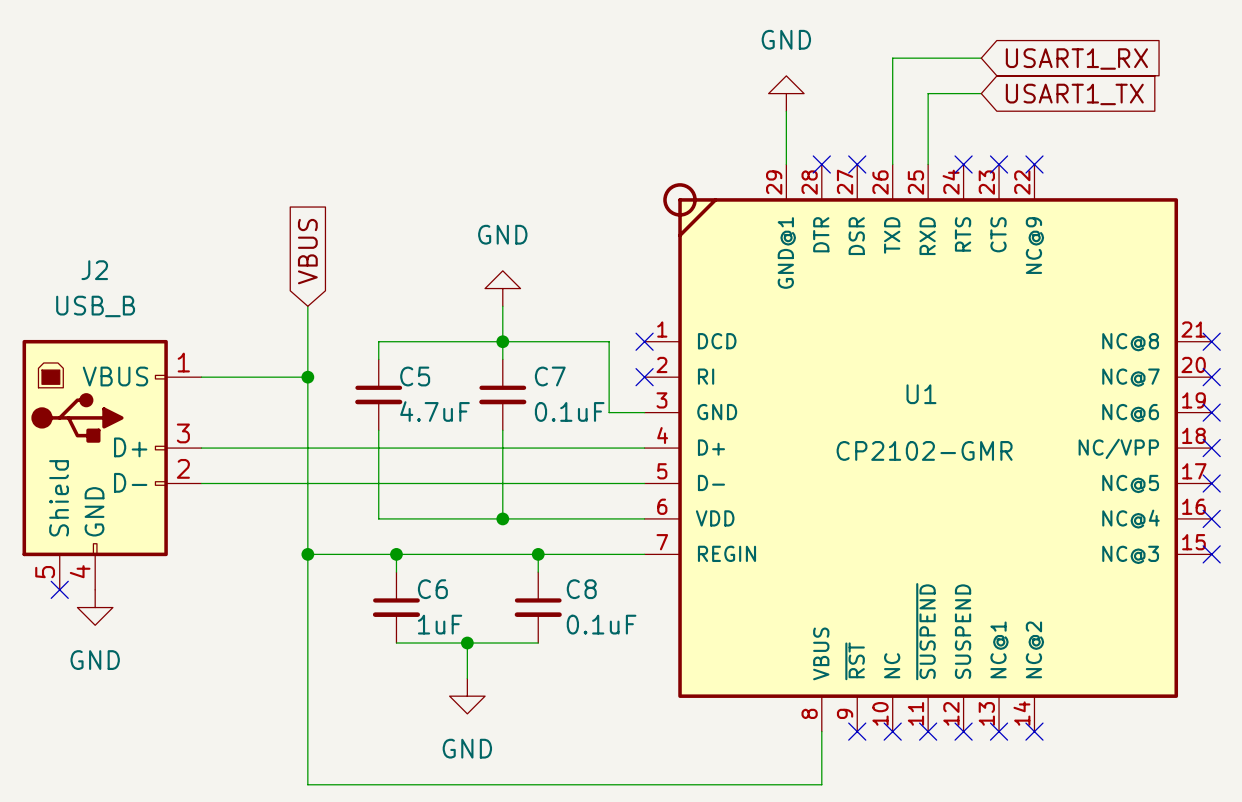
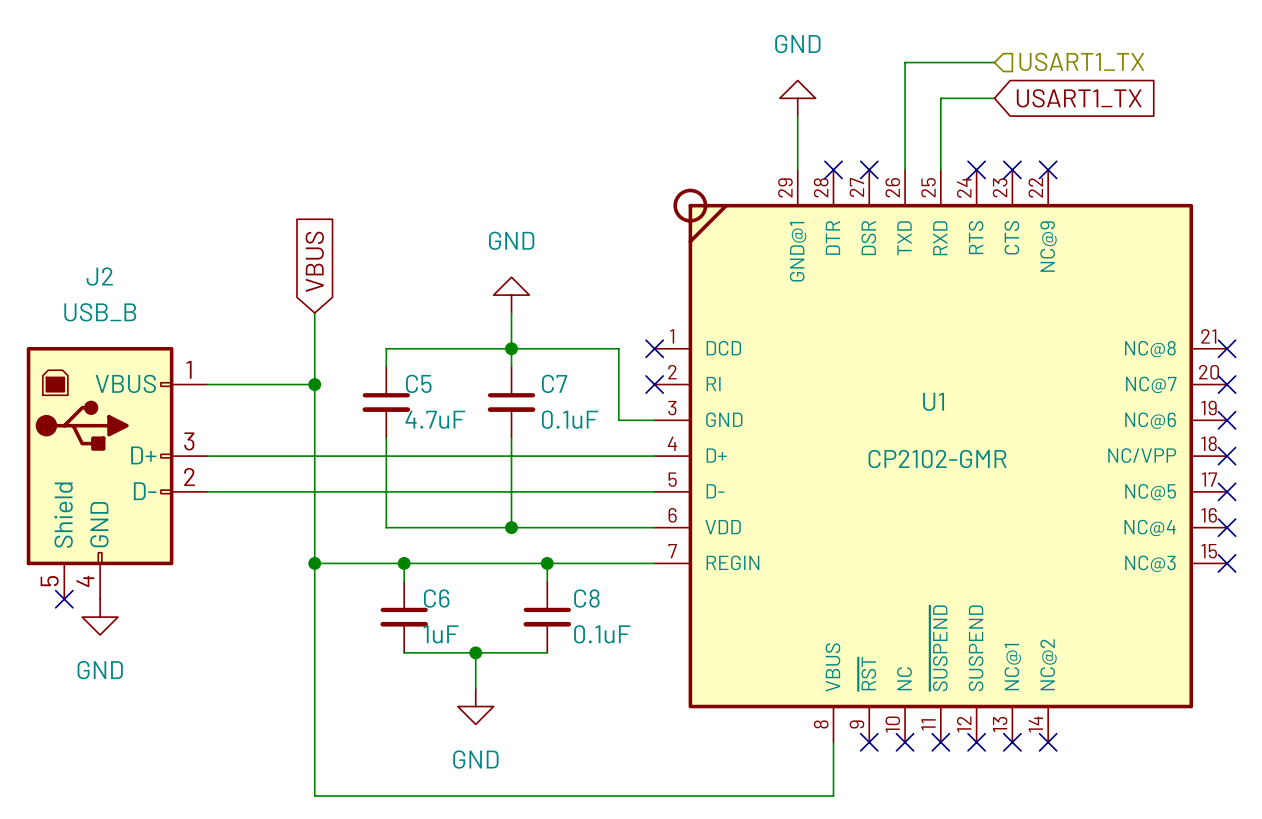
hierarchical label: none -> USART1_TX (1081, 61)
global label: USART1_RX (1076, 59) -> none

